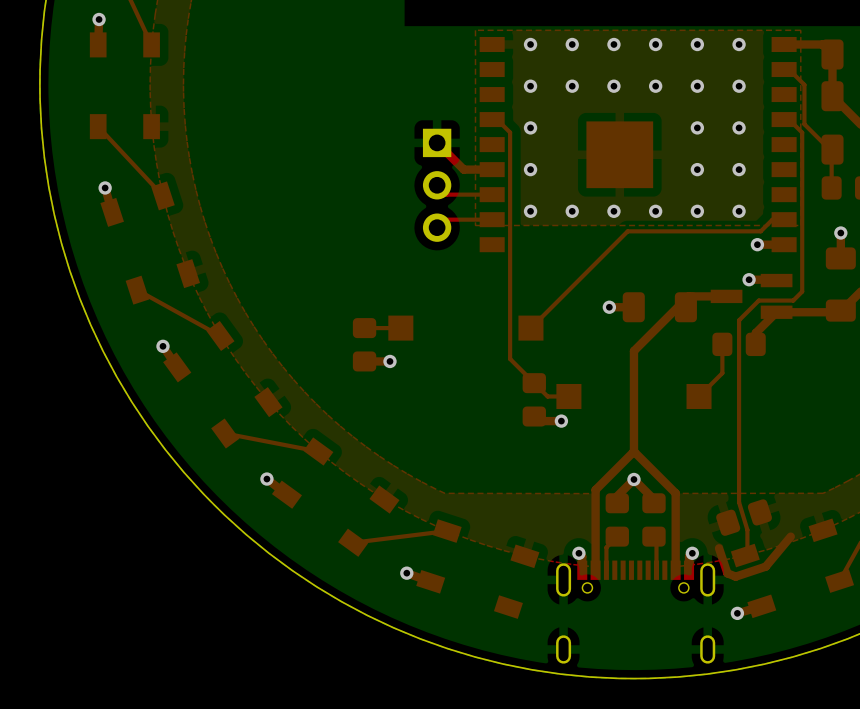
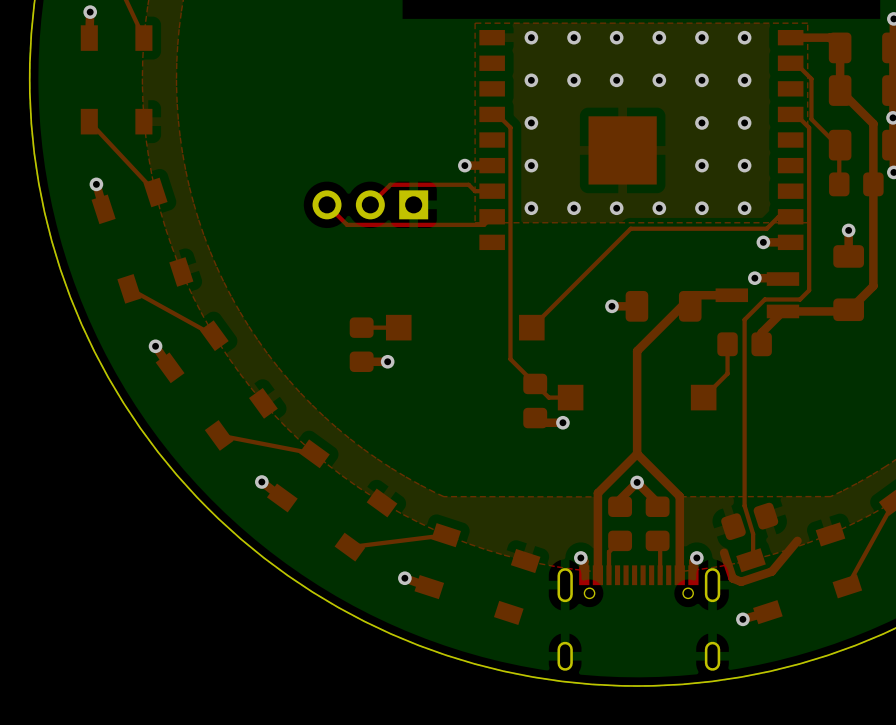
top track: (437, 142) (465, 169) -> none
via: none -> (464, 165)
top track: (437, 185) (446, 194) (475, 194) -> (370, 204) (390, 184) (468, 184) (475, 191)
part rotation: 0° (437, 185) -> 90° clockwise (370, 204)
part position: (437, 185) -> (370, 204)
top track: (492, 219) (445, 219) (437, 227) -> (492, 216) (484, 224) (347, 224) (327, 204)

